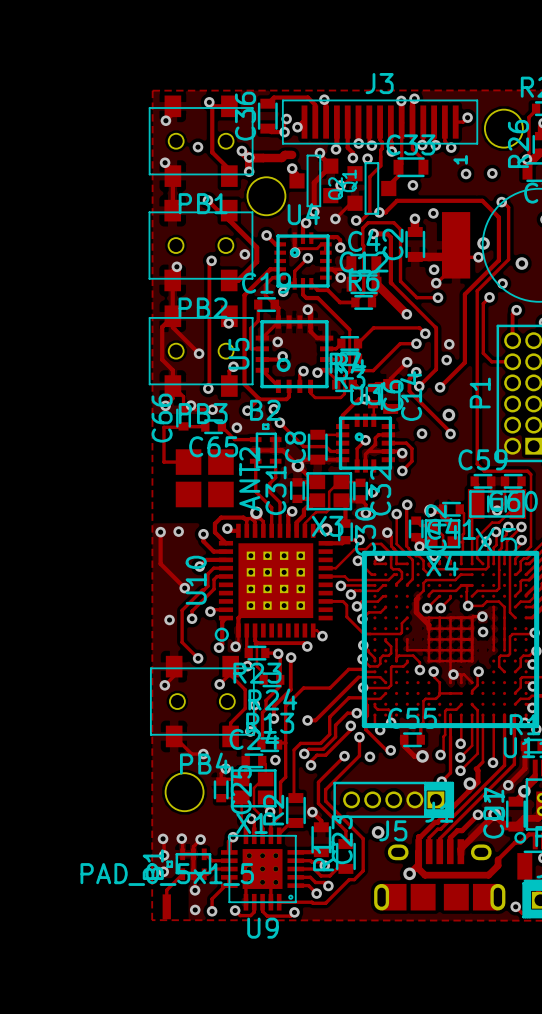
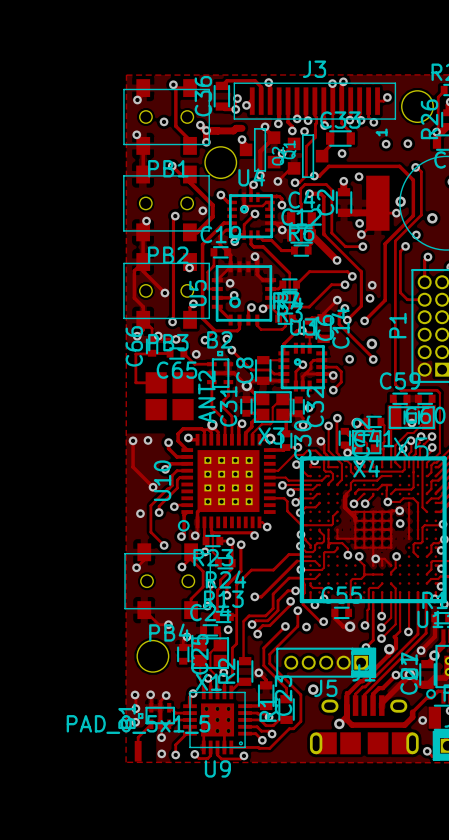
via: none -> (422, 720)

